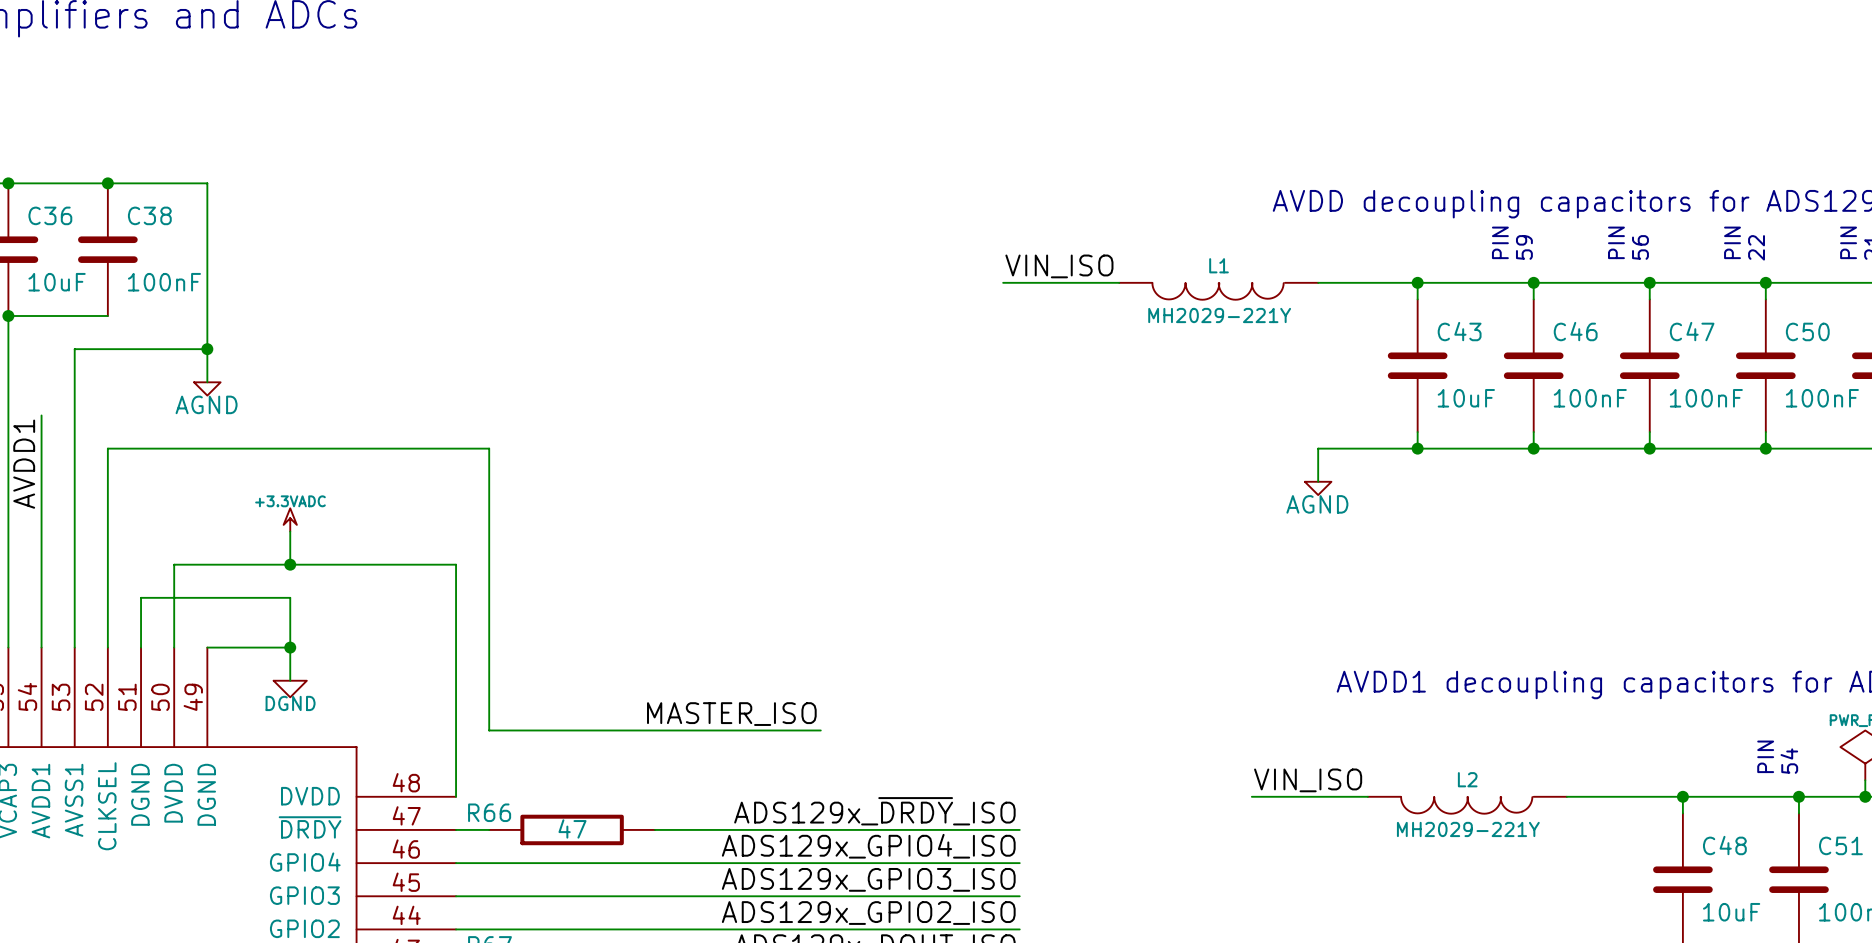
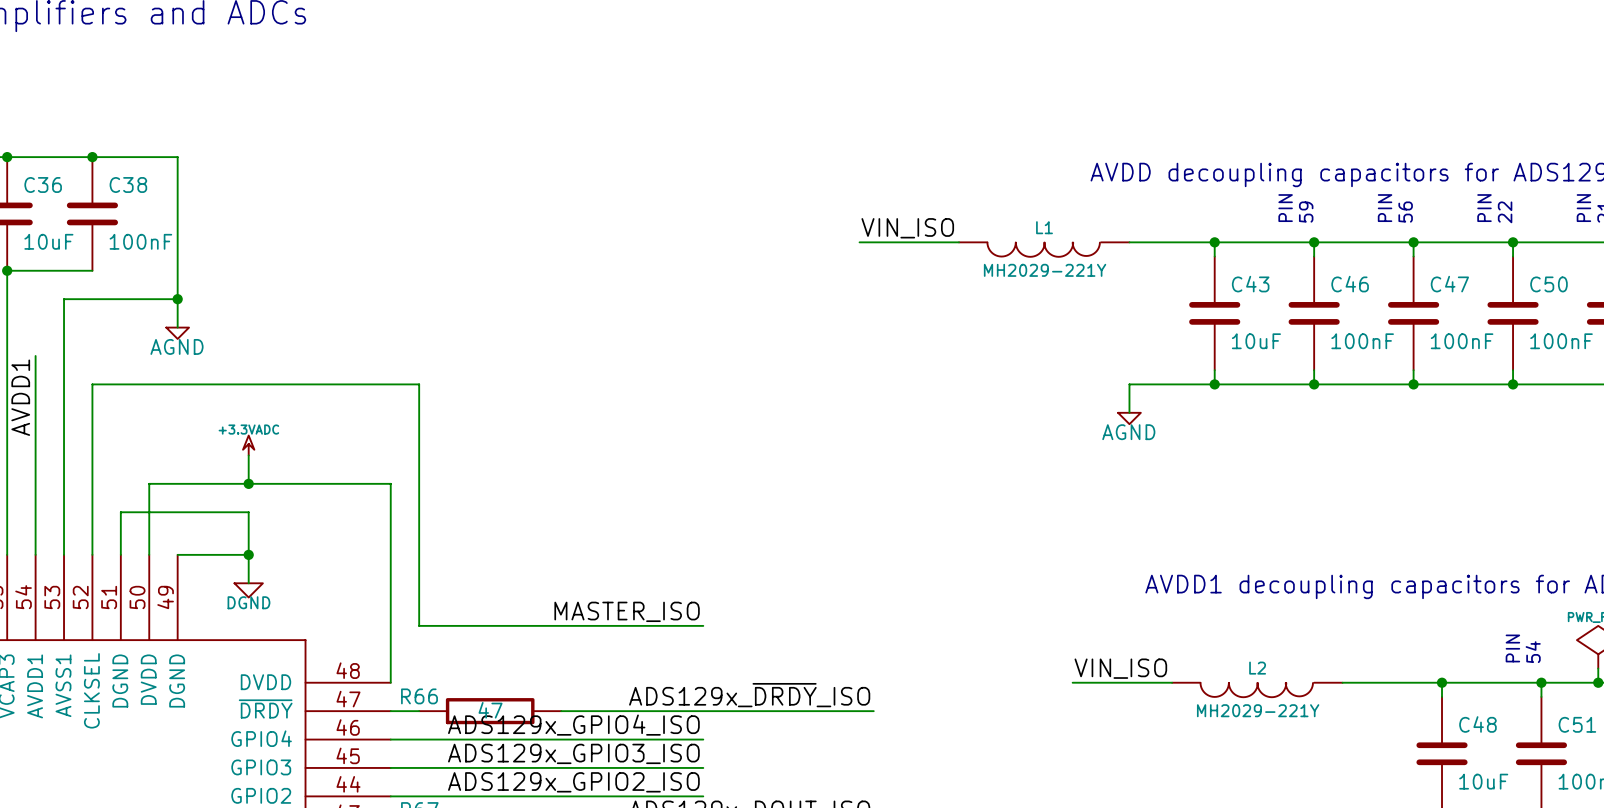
label position: ADS129x_GPIO4_ISO (868, 846) -> ADS129x_GPIO4_ISO (573, 725)
wire: (820, 863) (1019, 863) -> none
label position: ADS129x_GPIO3_ISO (868, 879) -> ADS129x_GPIO3_ISO (573, 753)
wire: (820, 896) (1019, 896) -> none
label position: ADS129x_GPIO2_ISO (868, 913) -> ADS129x_GPIO2_ISO (573, 782)
wire: (820, 929) (1019, 929) -> none

